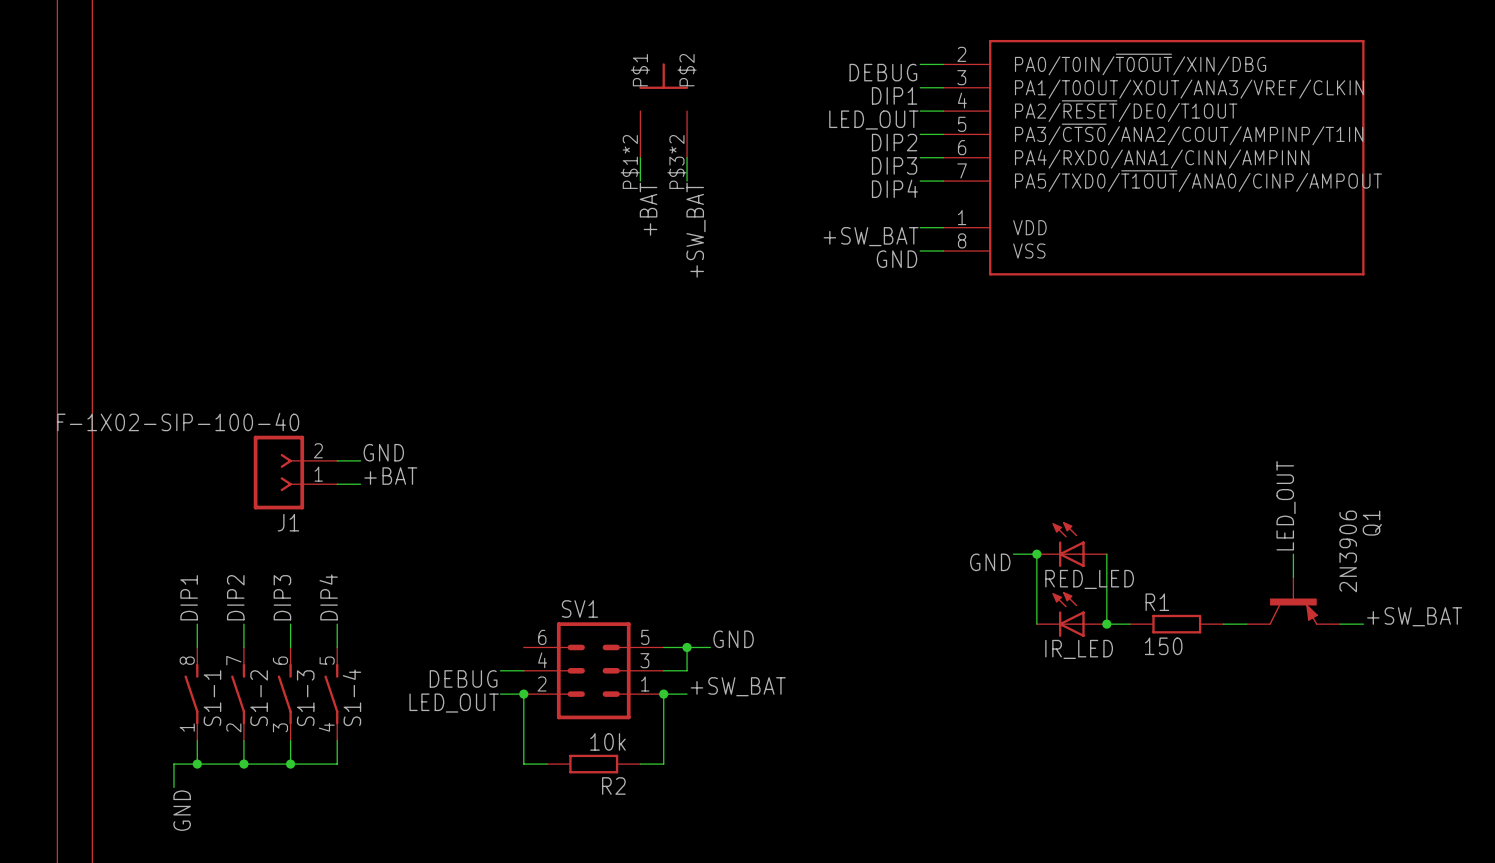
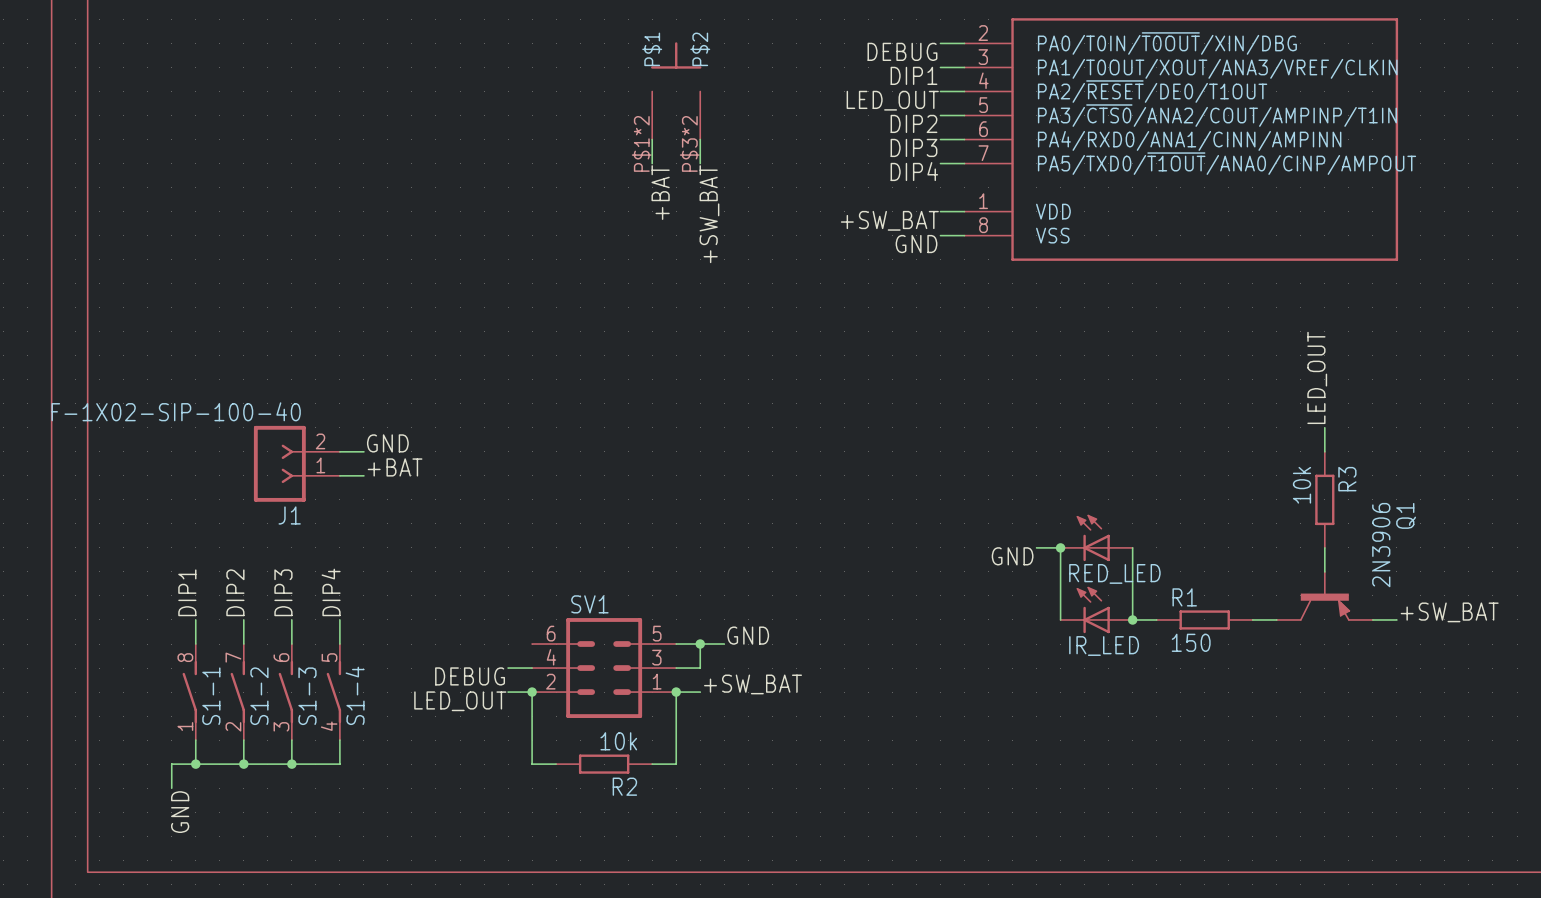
wire: none -> (1324, 427) (1324, 451)
label position: LED_OUT (1286, 505) -> LED_OUT (1317, 377)
R3: none -> 10k (1324, 499)

